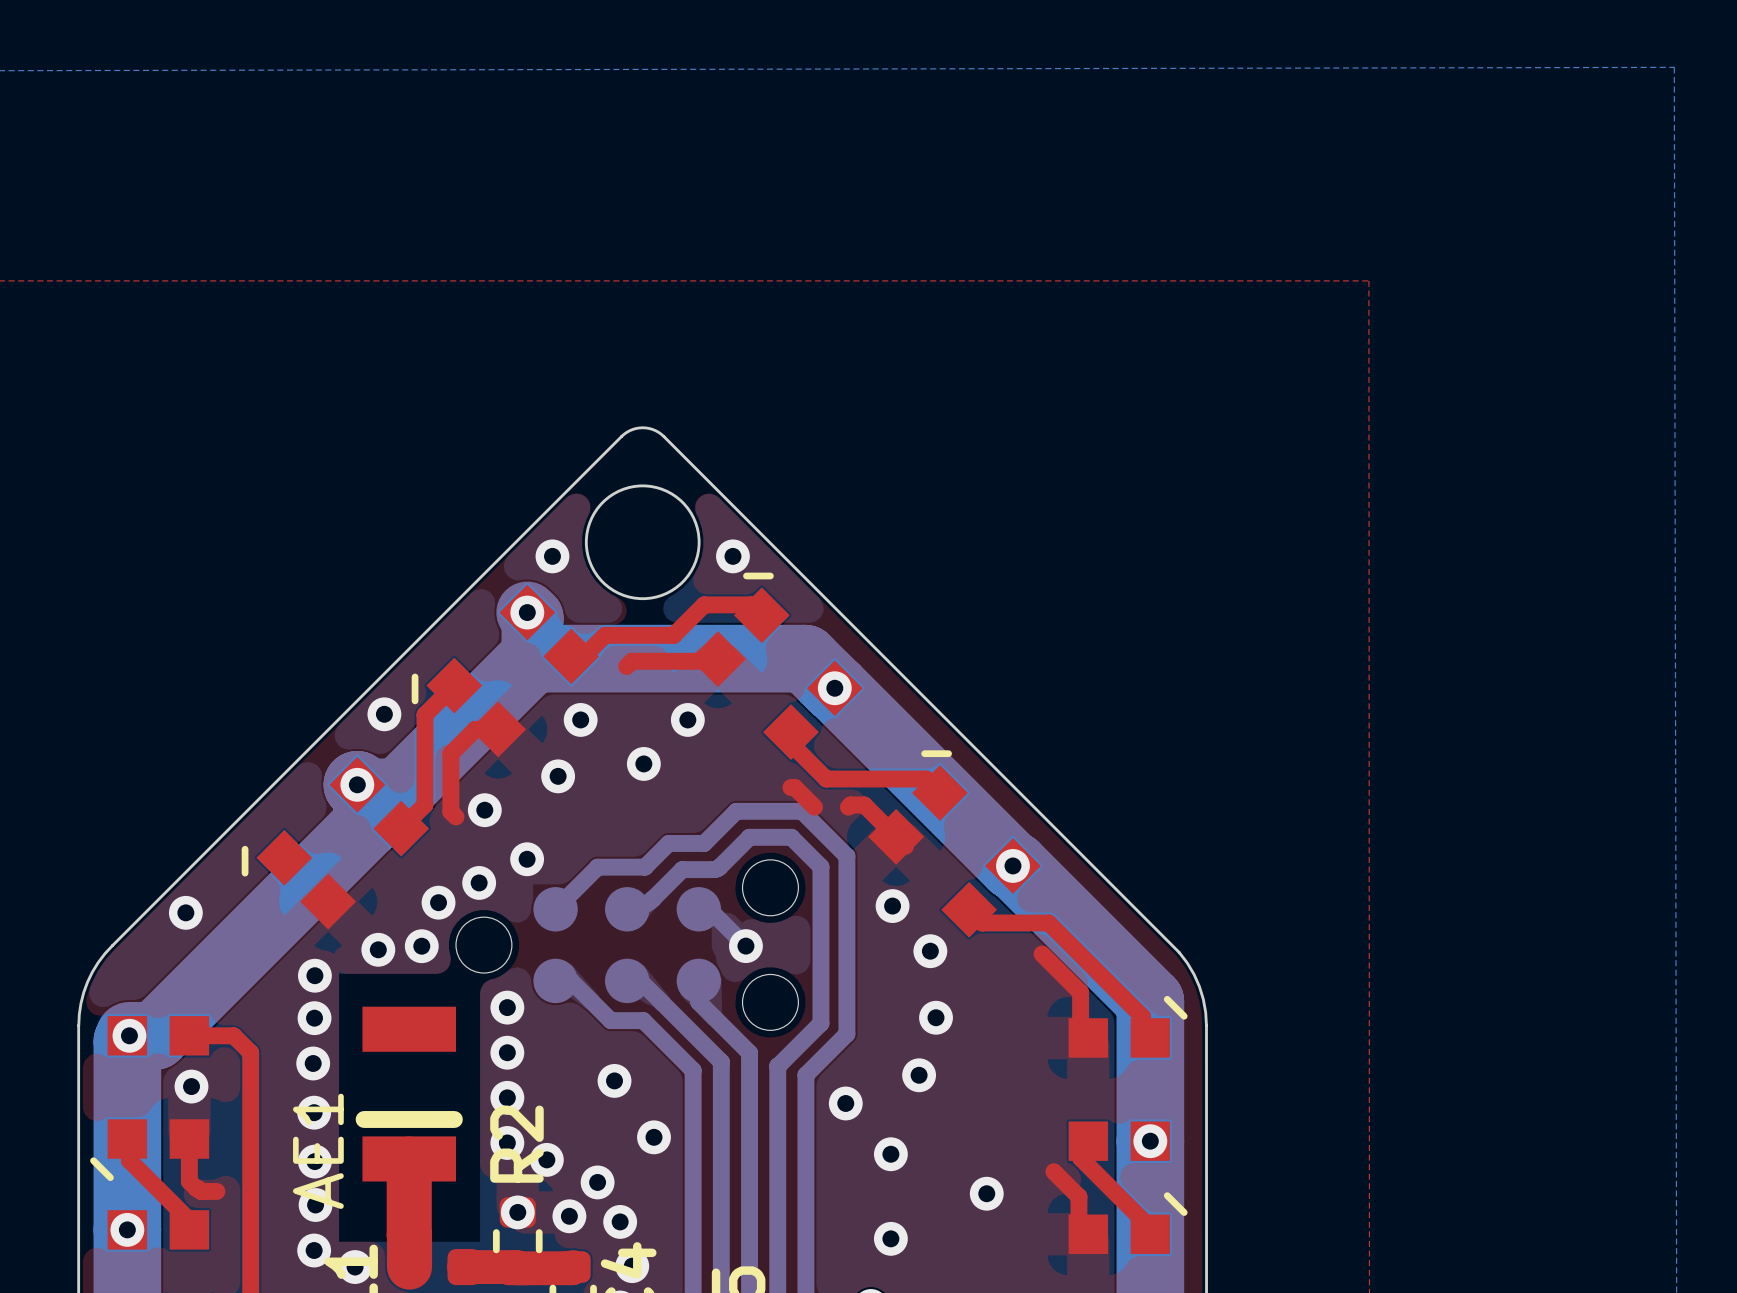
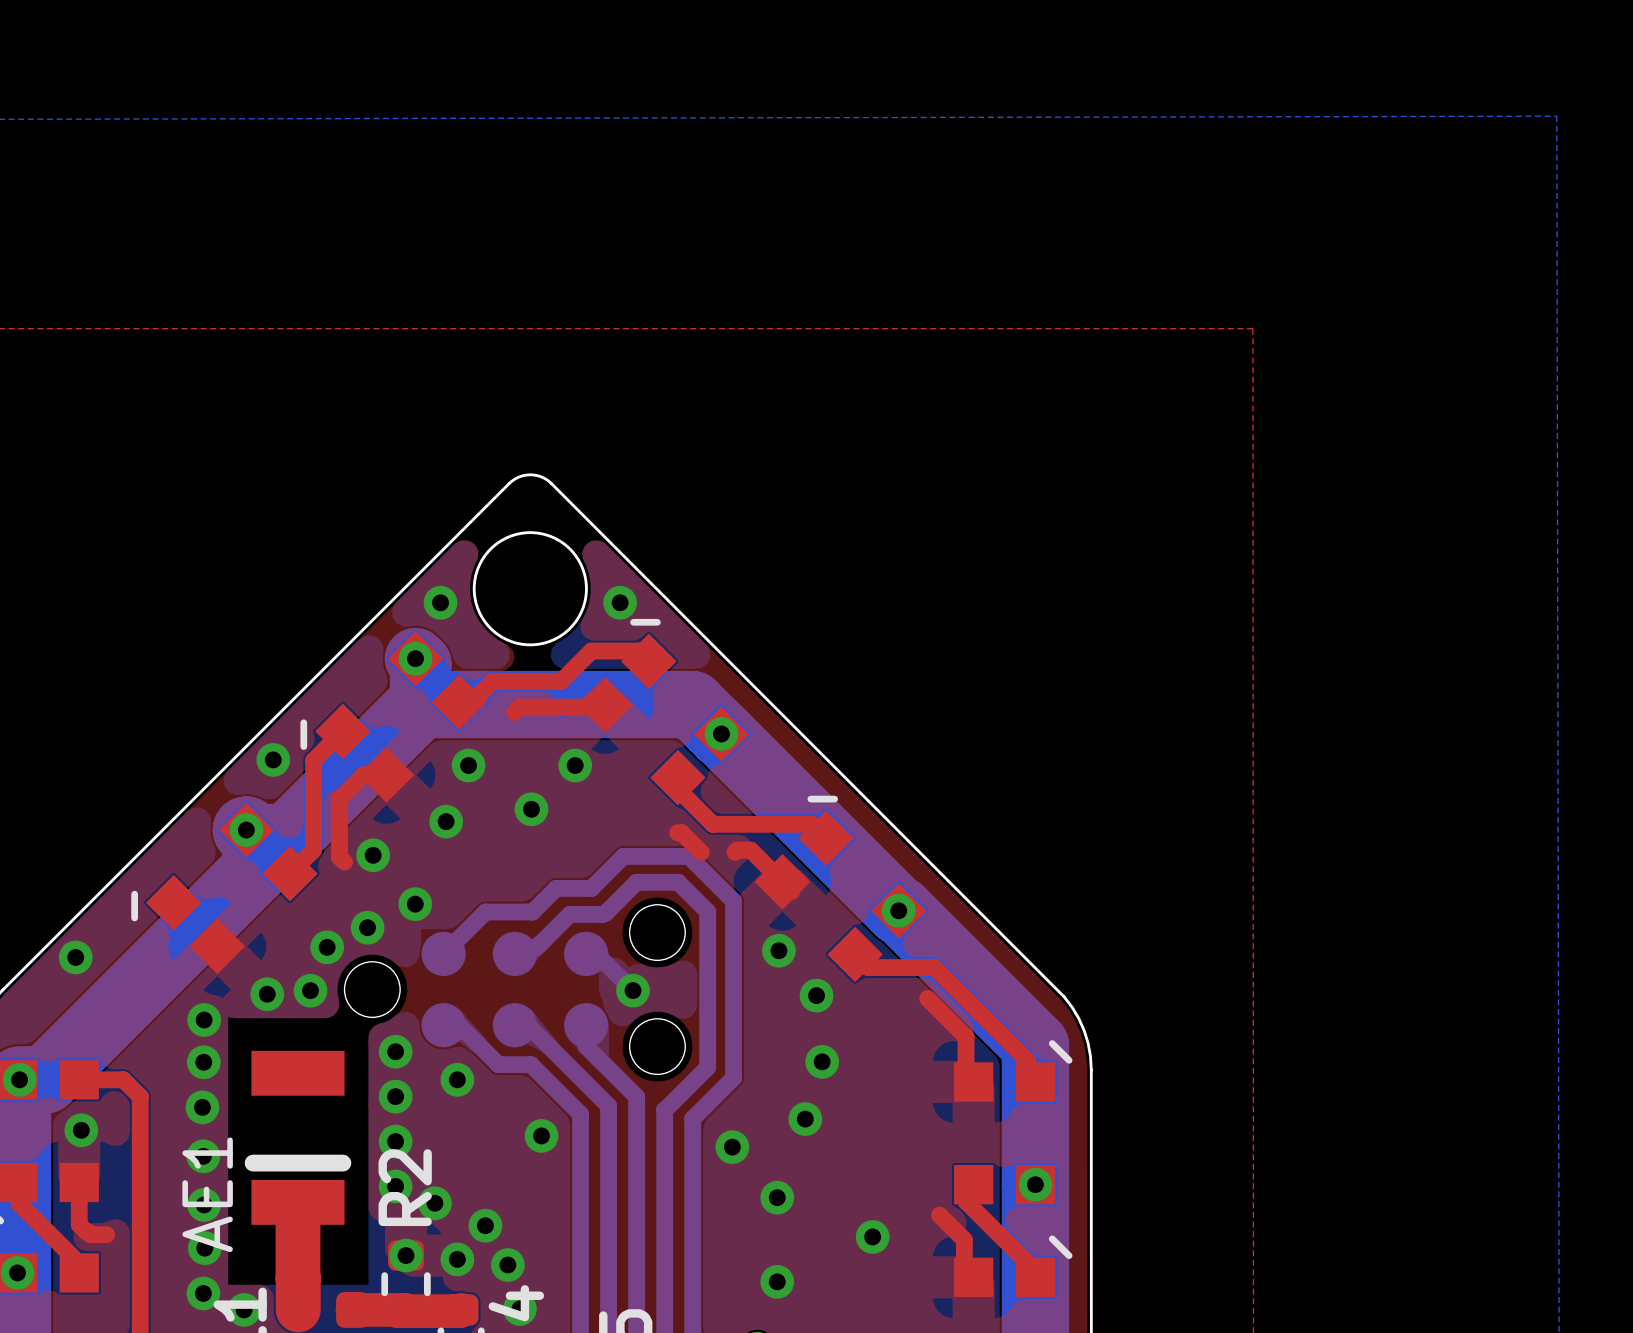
via: none -> (457, 1079)
via: (614, 1080) -> none
via: none -> (541, 1135)
via: (654, 1137) -> none

